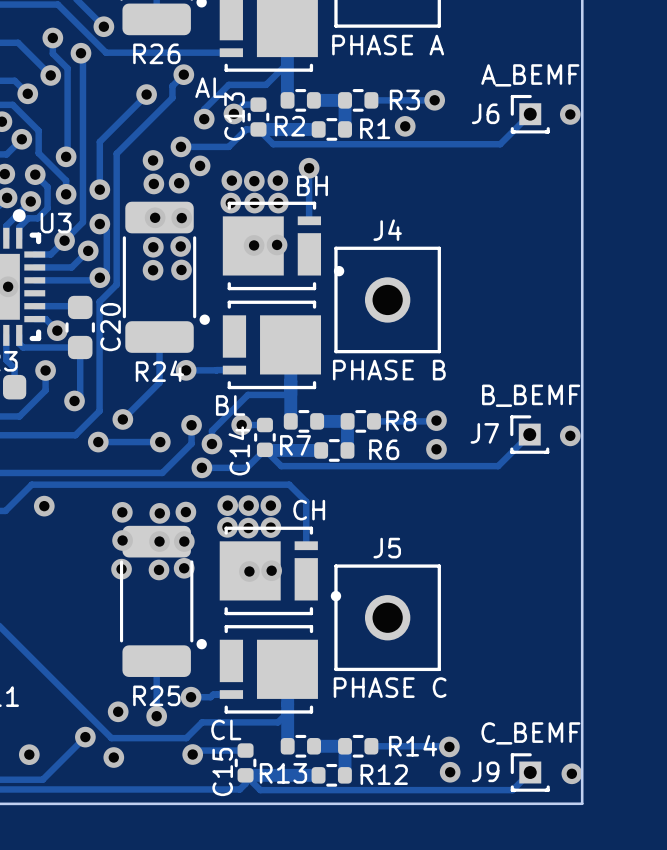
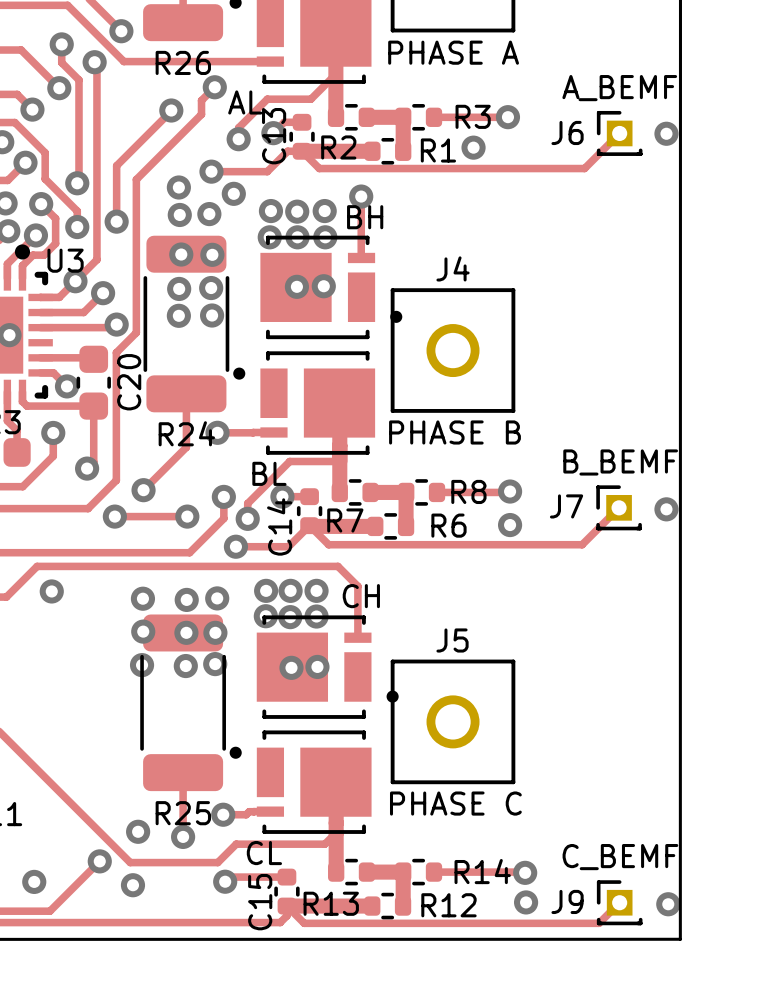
track: (99, 224) (106, 230) (106, 270) (99, 277) -> none
via: (99, 224) -> none

